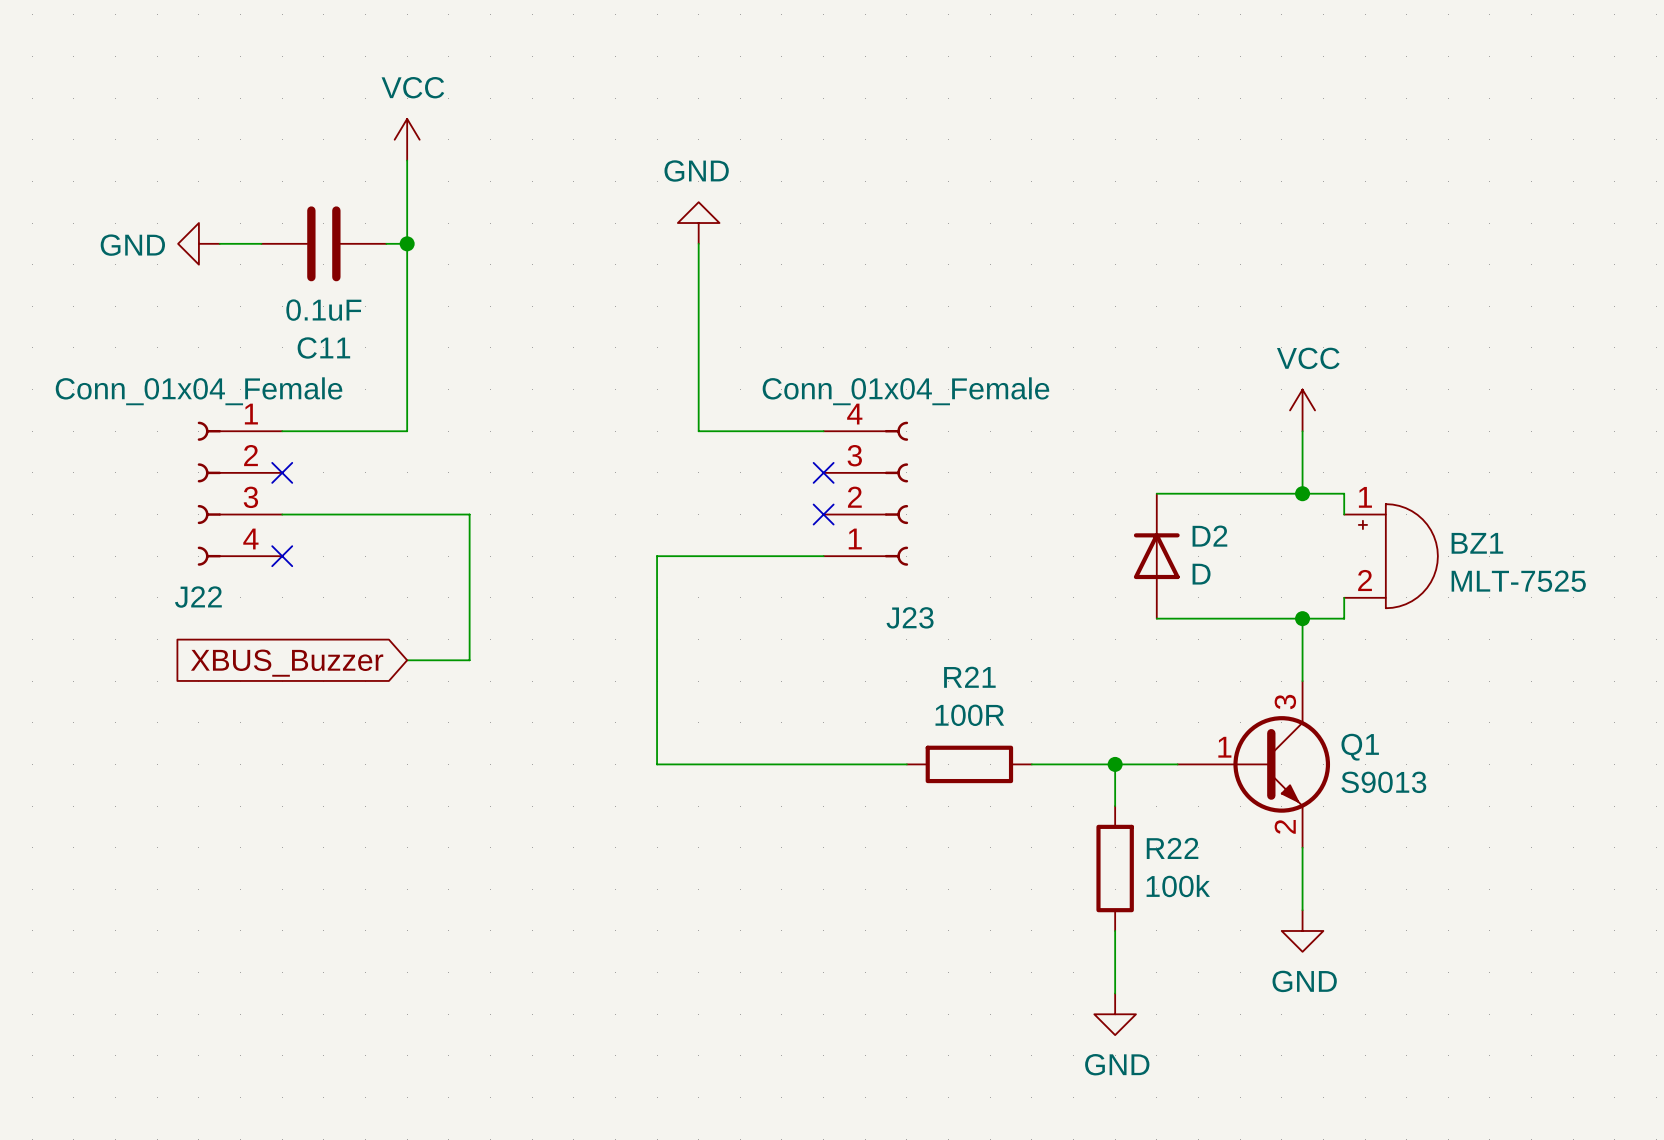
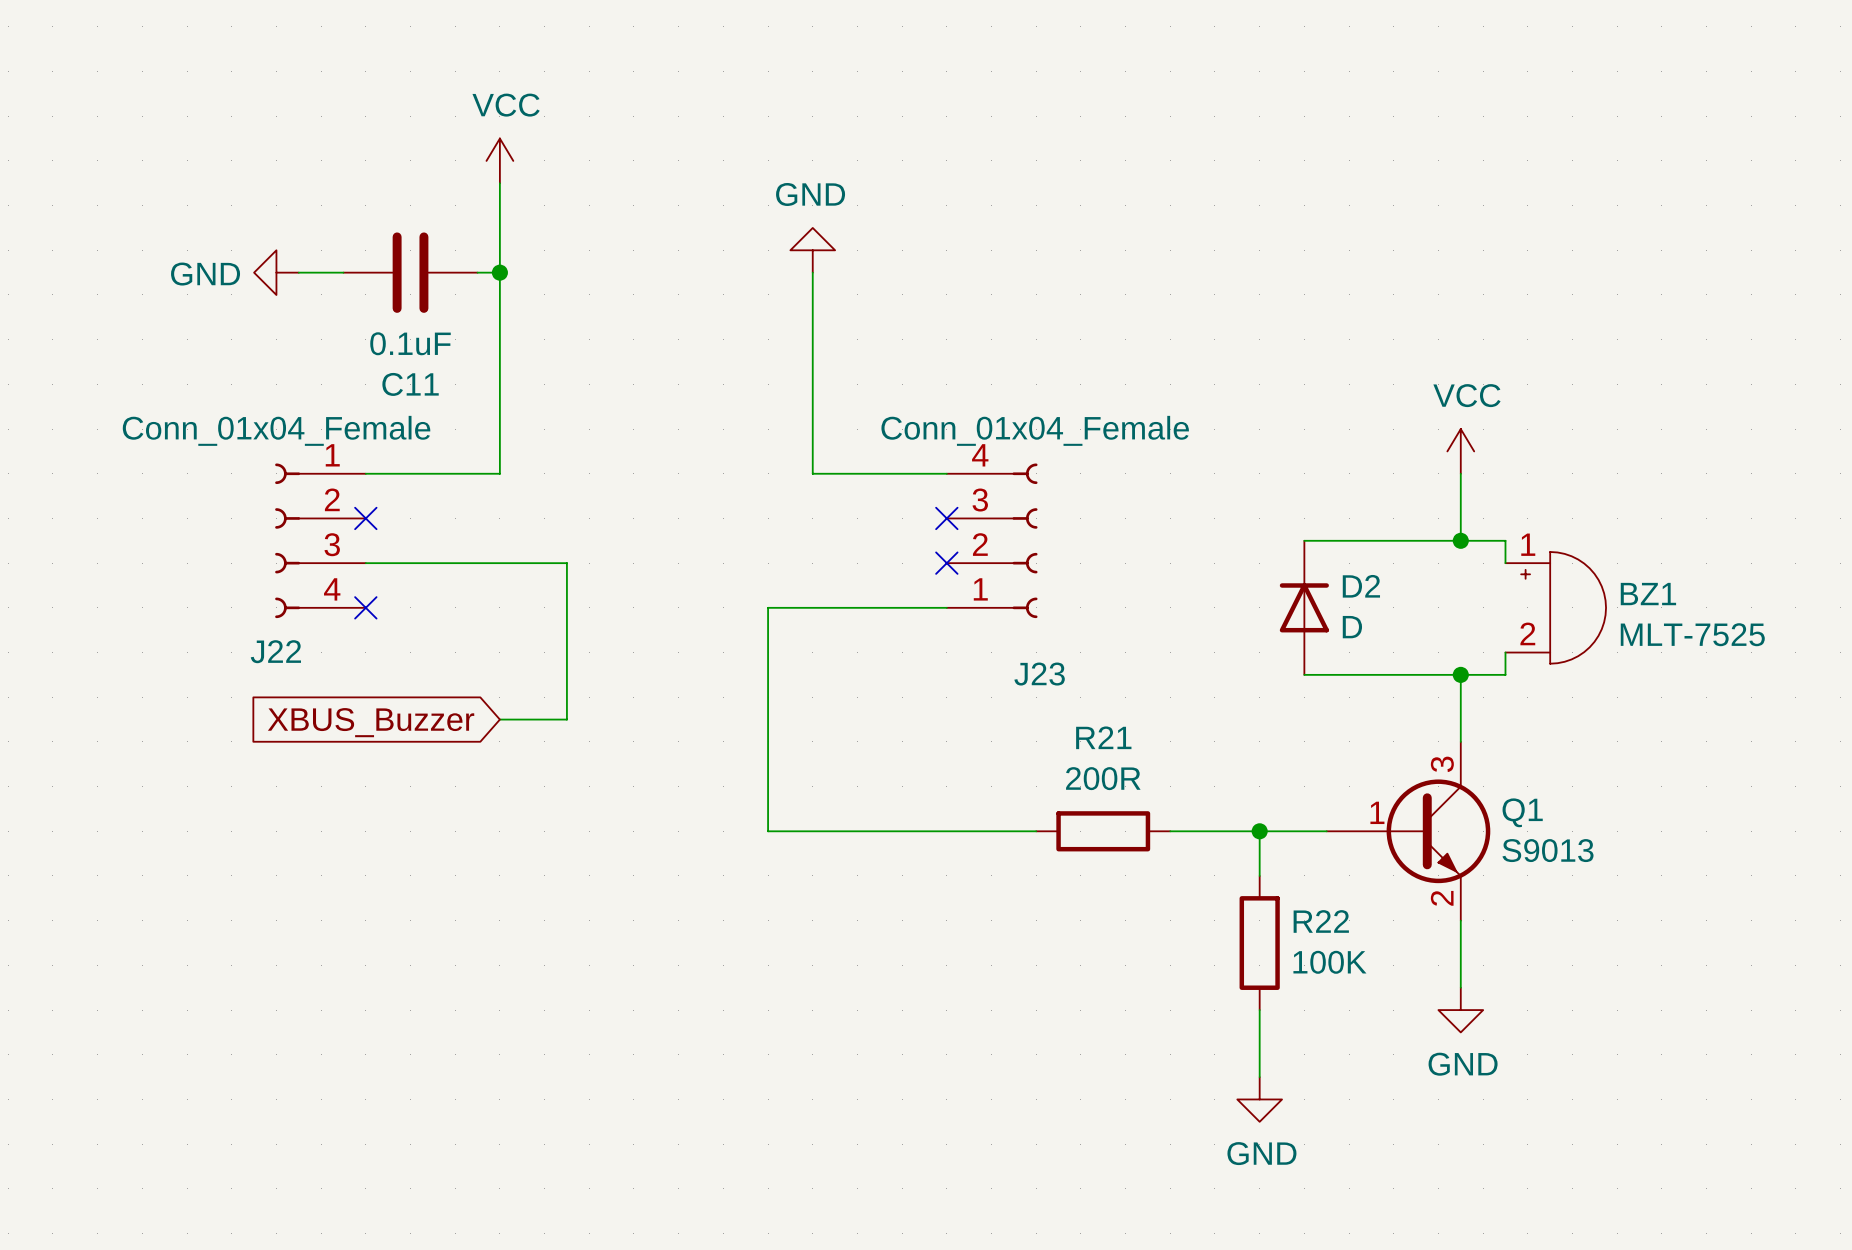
R21 value: 100R (969, 715) -> 200R (1103, 778)
R22 value: 100k (1178, 886) -> 100K (1329, 962)

